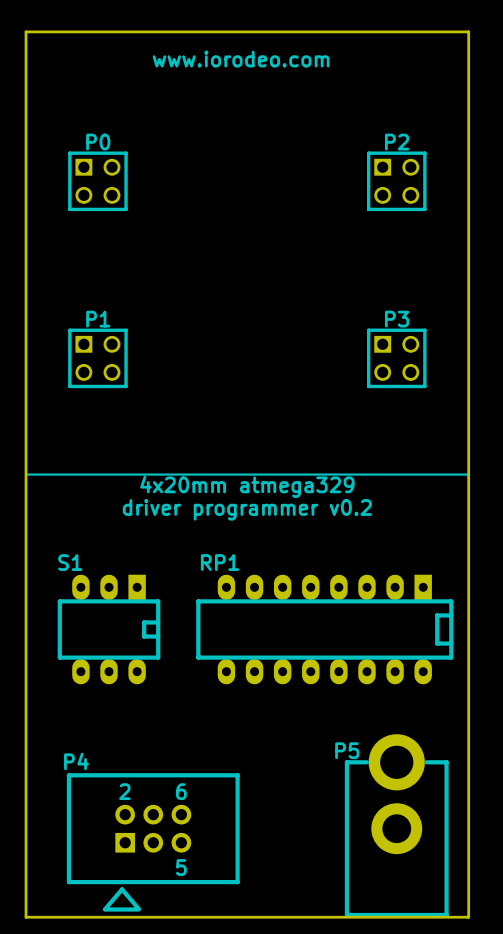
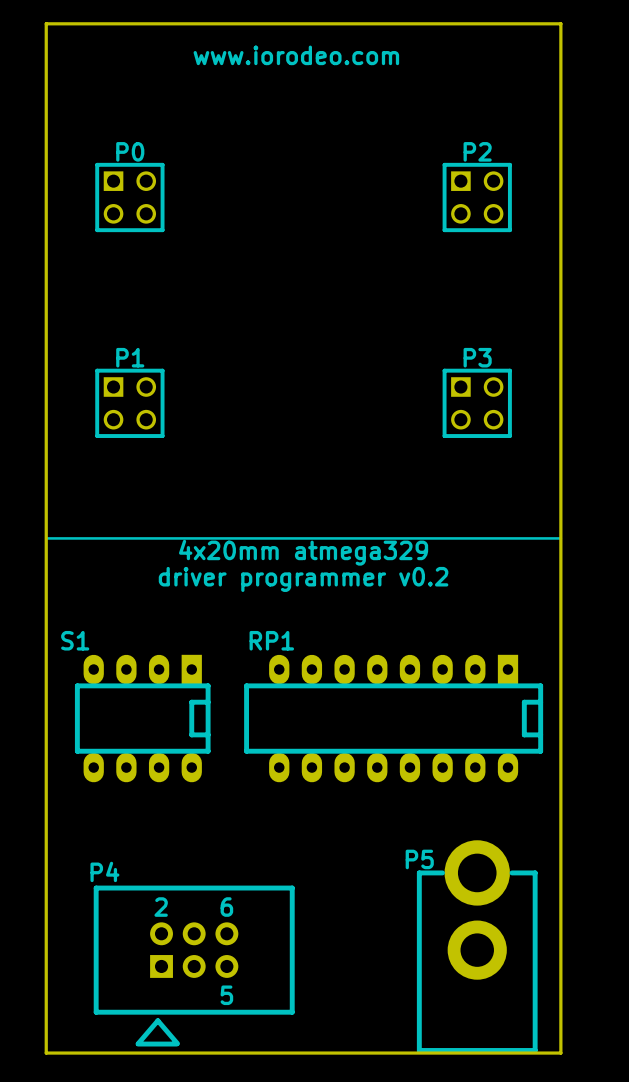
S1 footprint: [57, 574, 161, 685] -> [74, 654, 211, 783]

